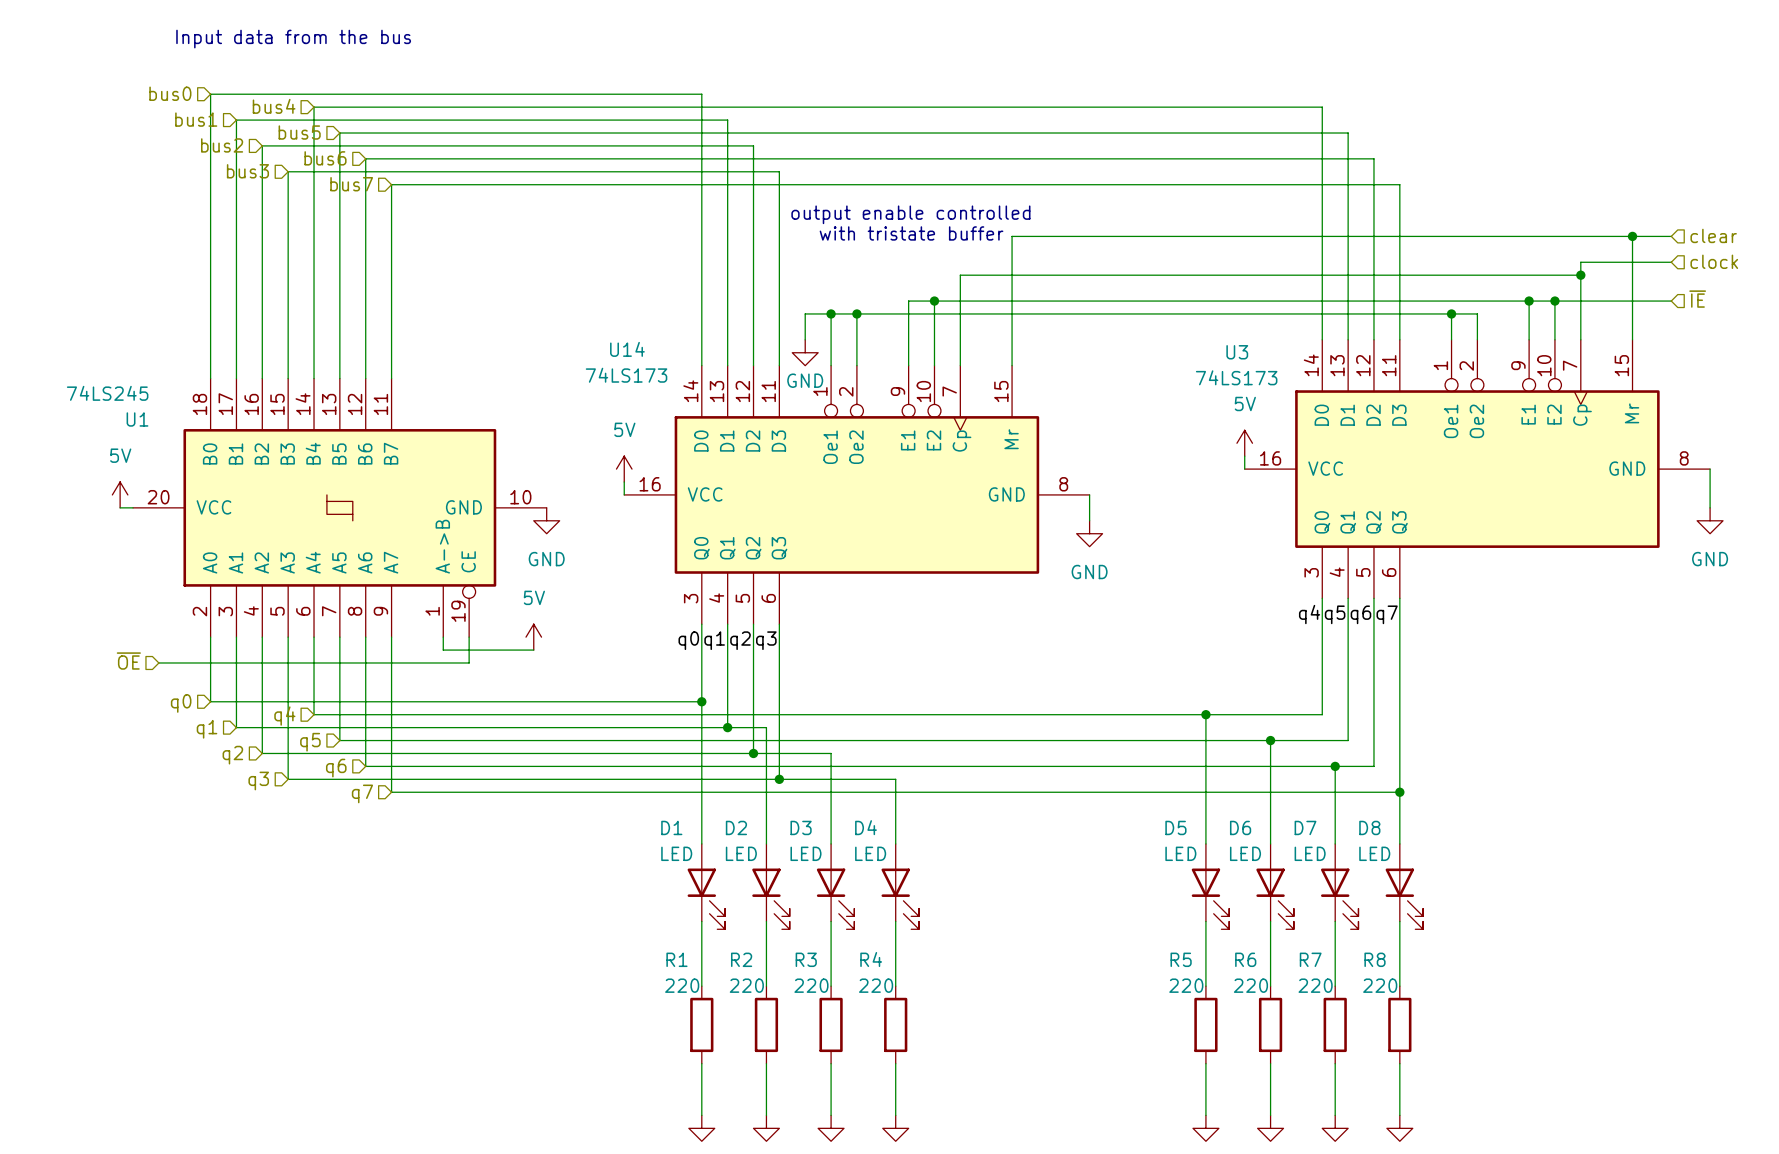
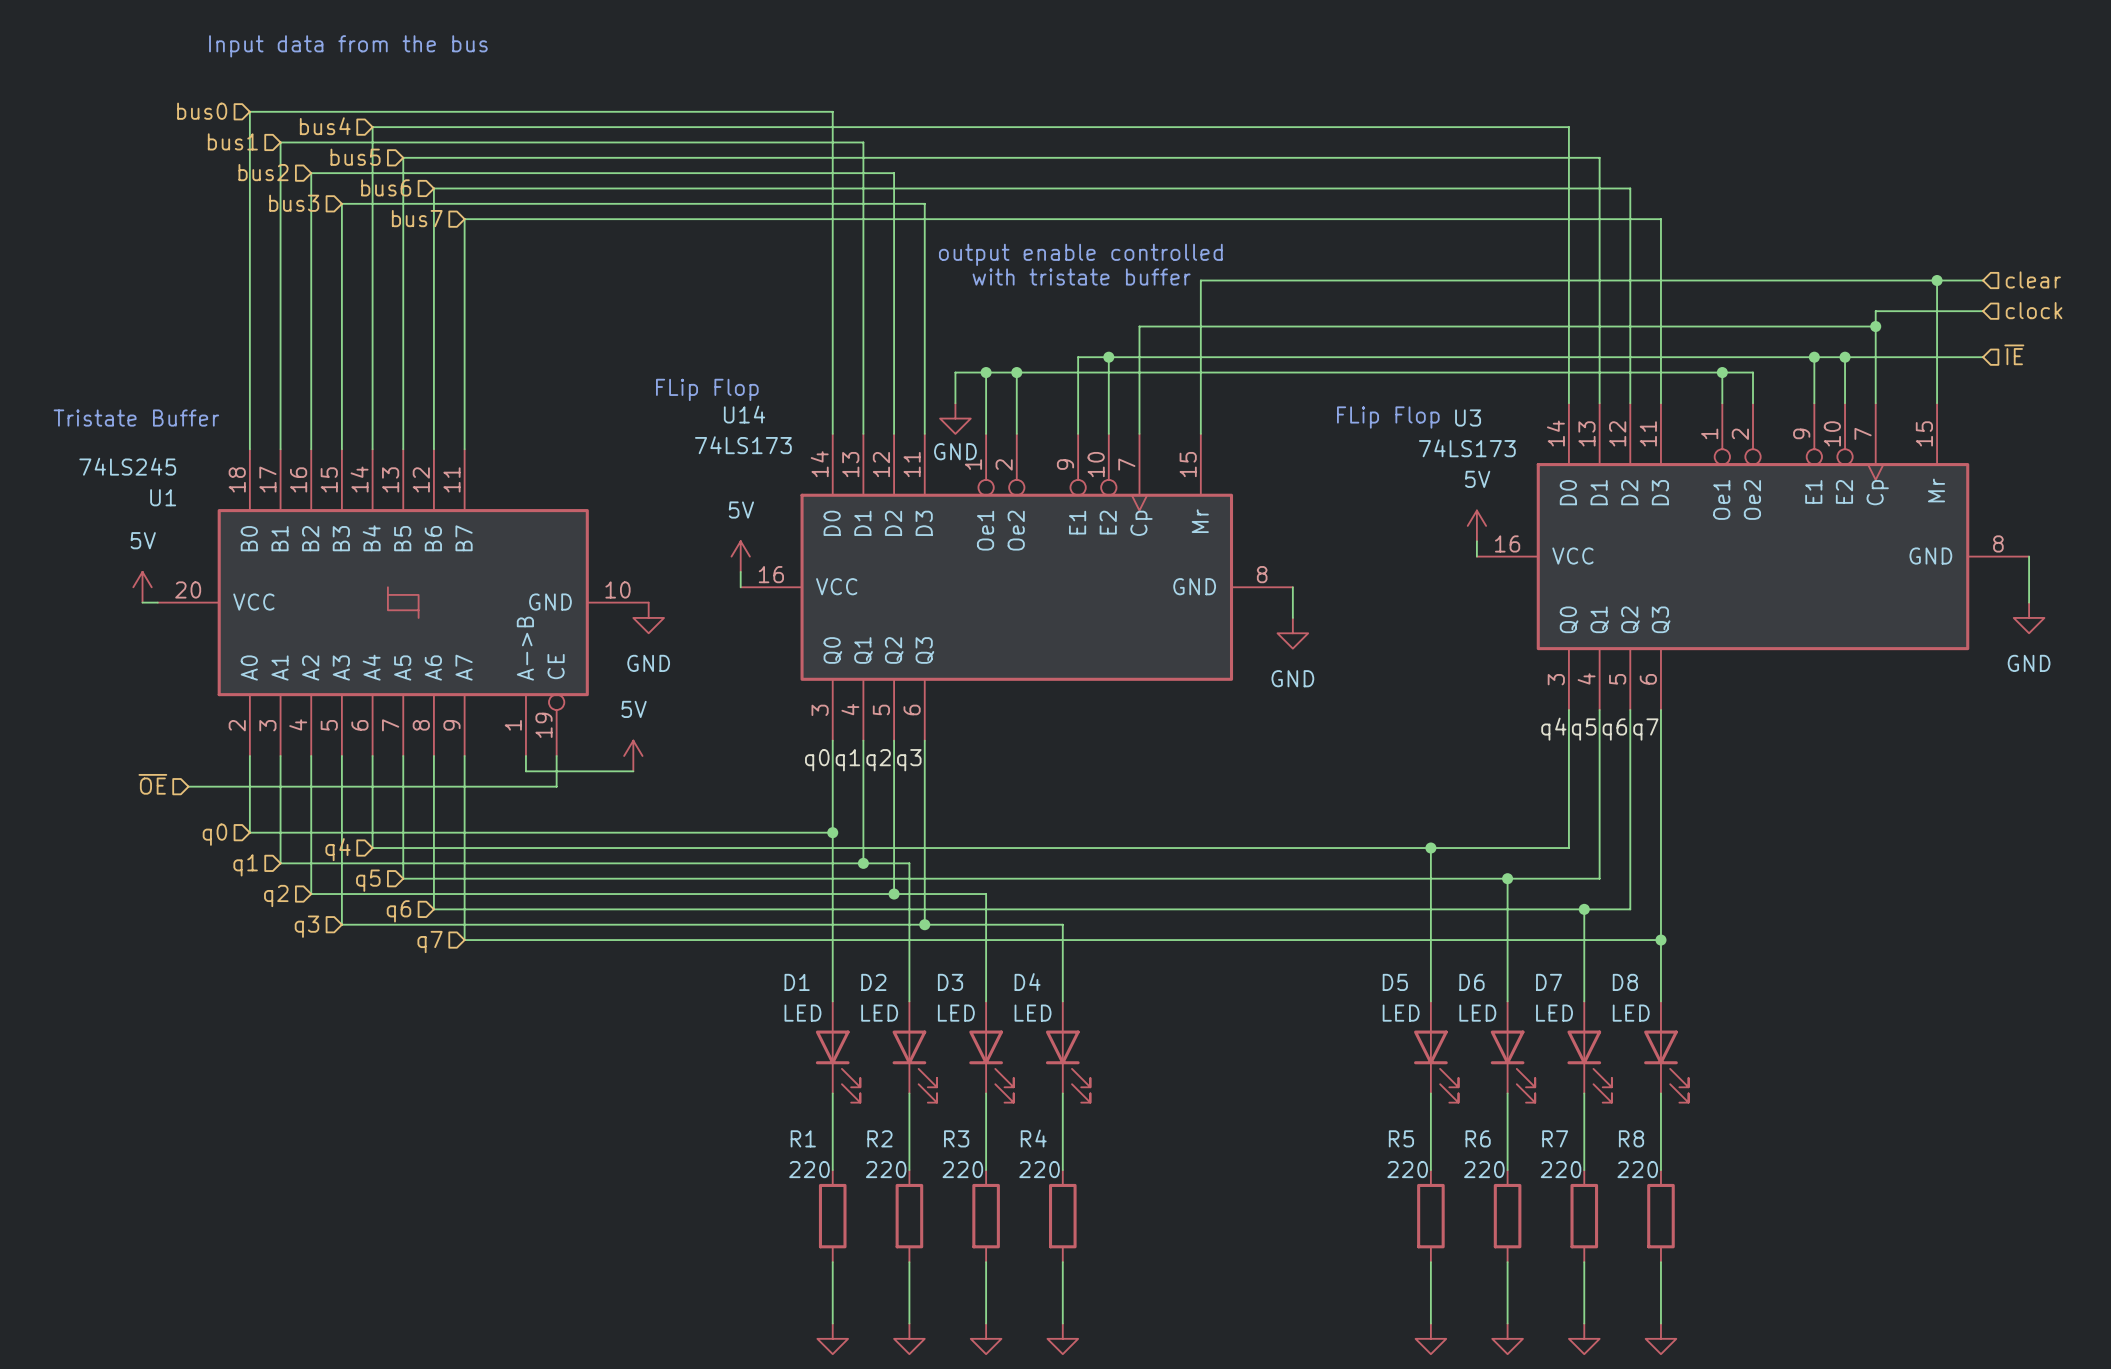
text: none -> FLip Flop (707, 389)
text: none -> FLip Flop (1388, 417)
text: none -> Tristate Buffer (136, 418)

